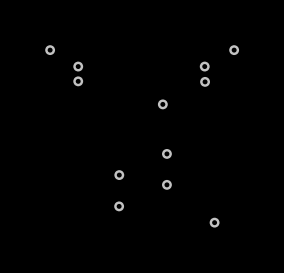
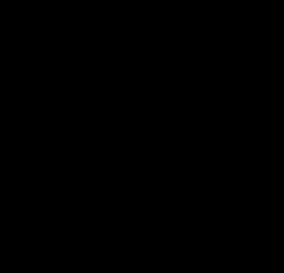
via: (50, 50) -> none
via: (234, 50) -> none
via: (78, 66) -> none
via: (204, 66) -> none
via: (78, 81) -> none
via: (205, 81) -> none
via: (162, 104) -> none
via: (166, 153) -> none
via: (119, 175) -> none
via: (166, 184) -> none
via: (119, 206) -> none
via: (214, 222) -> none

